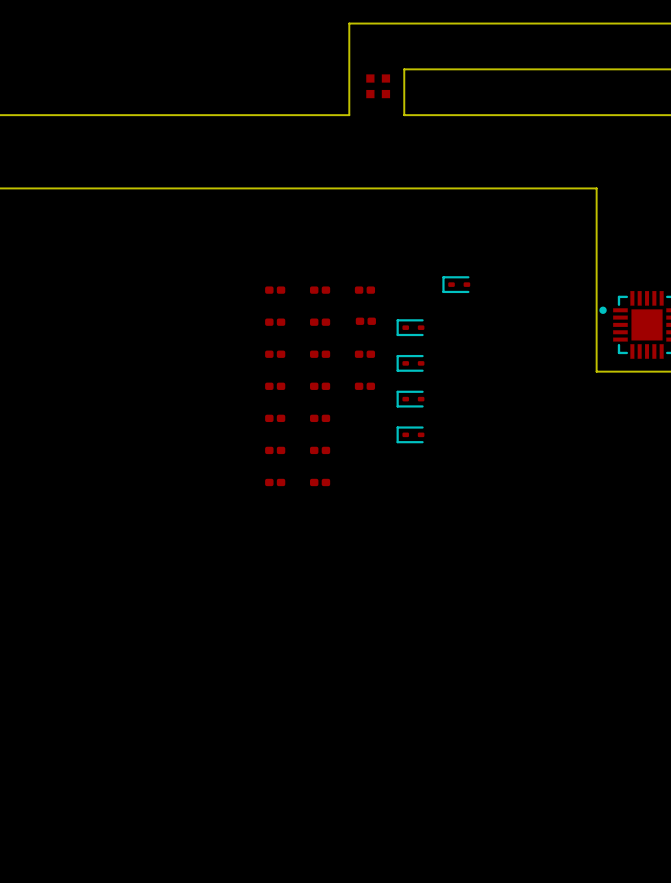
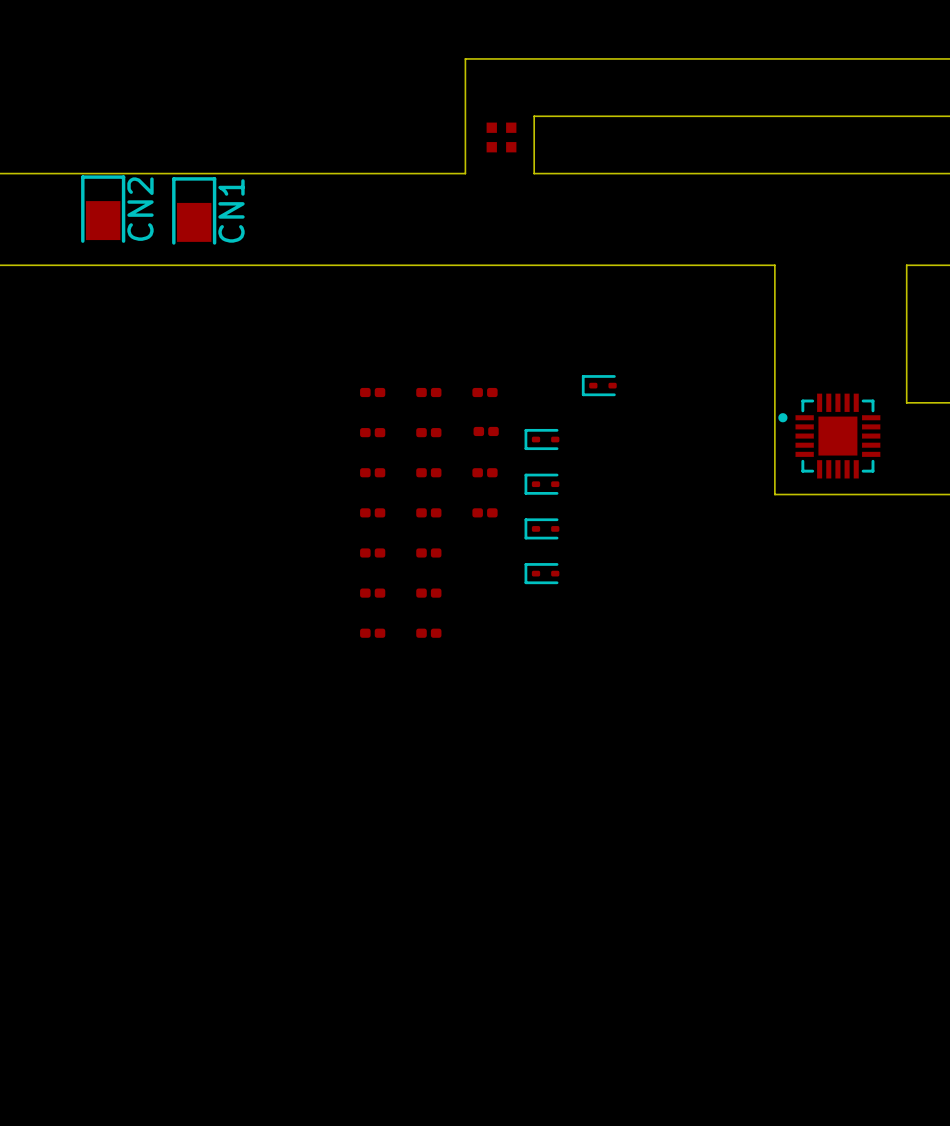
CN2: none -> (103, 209)
CN1: none -> (194, 210)

